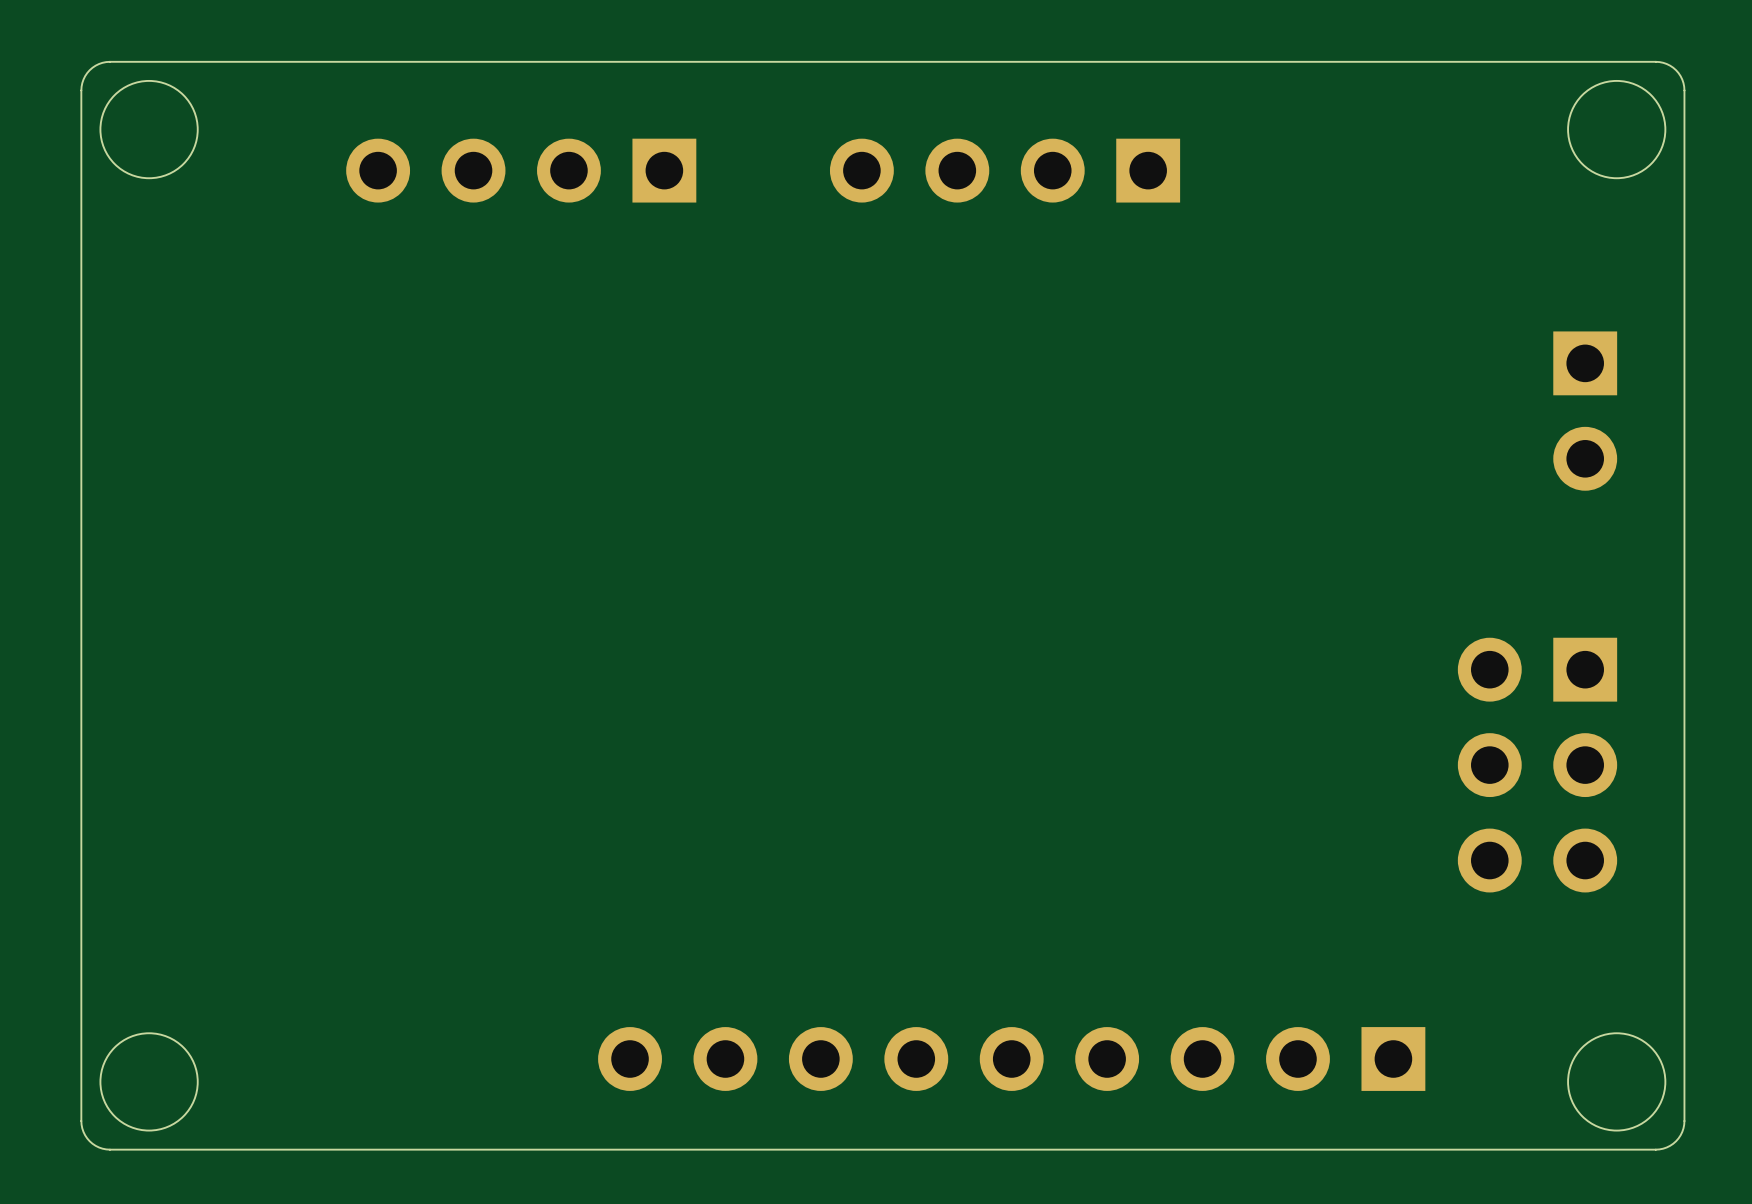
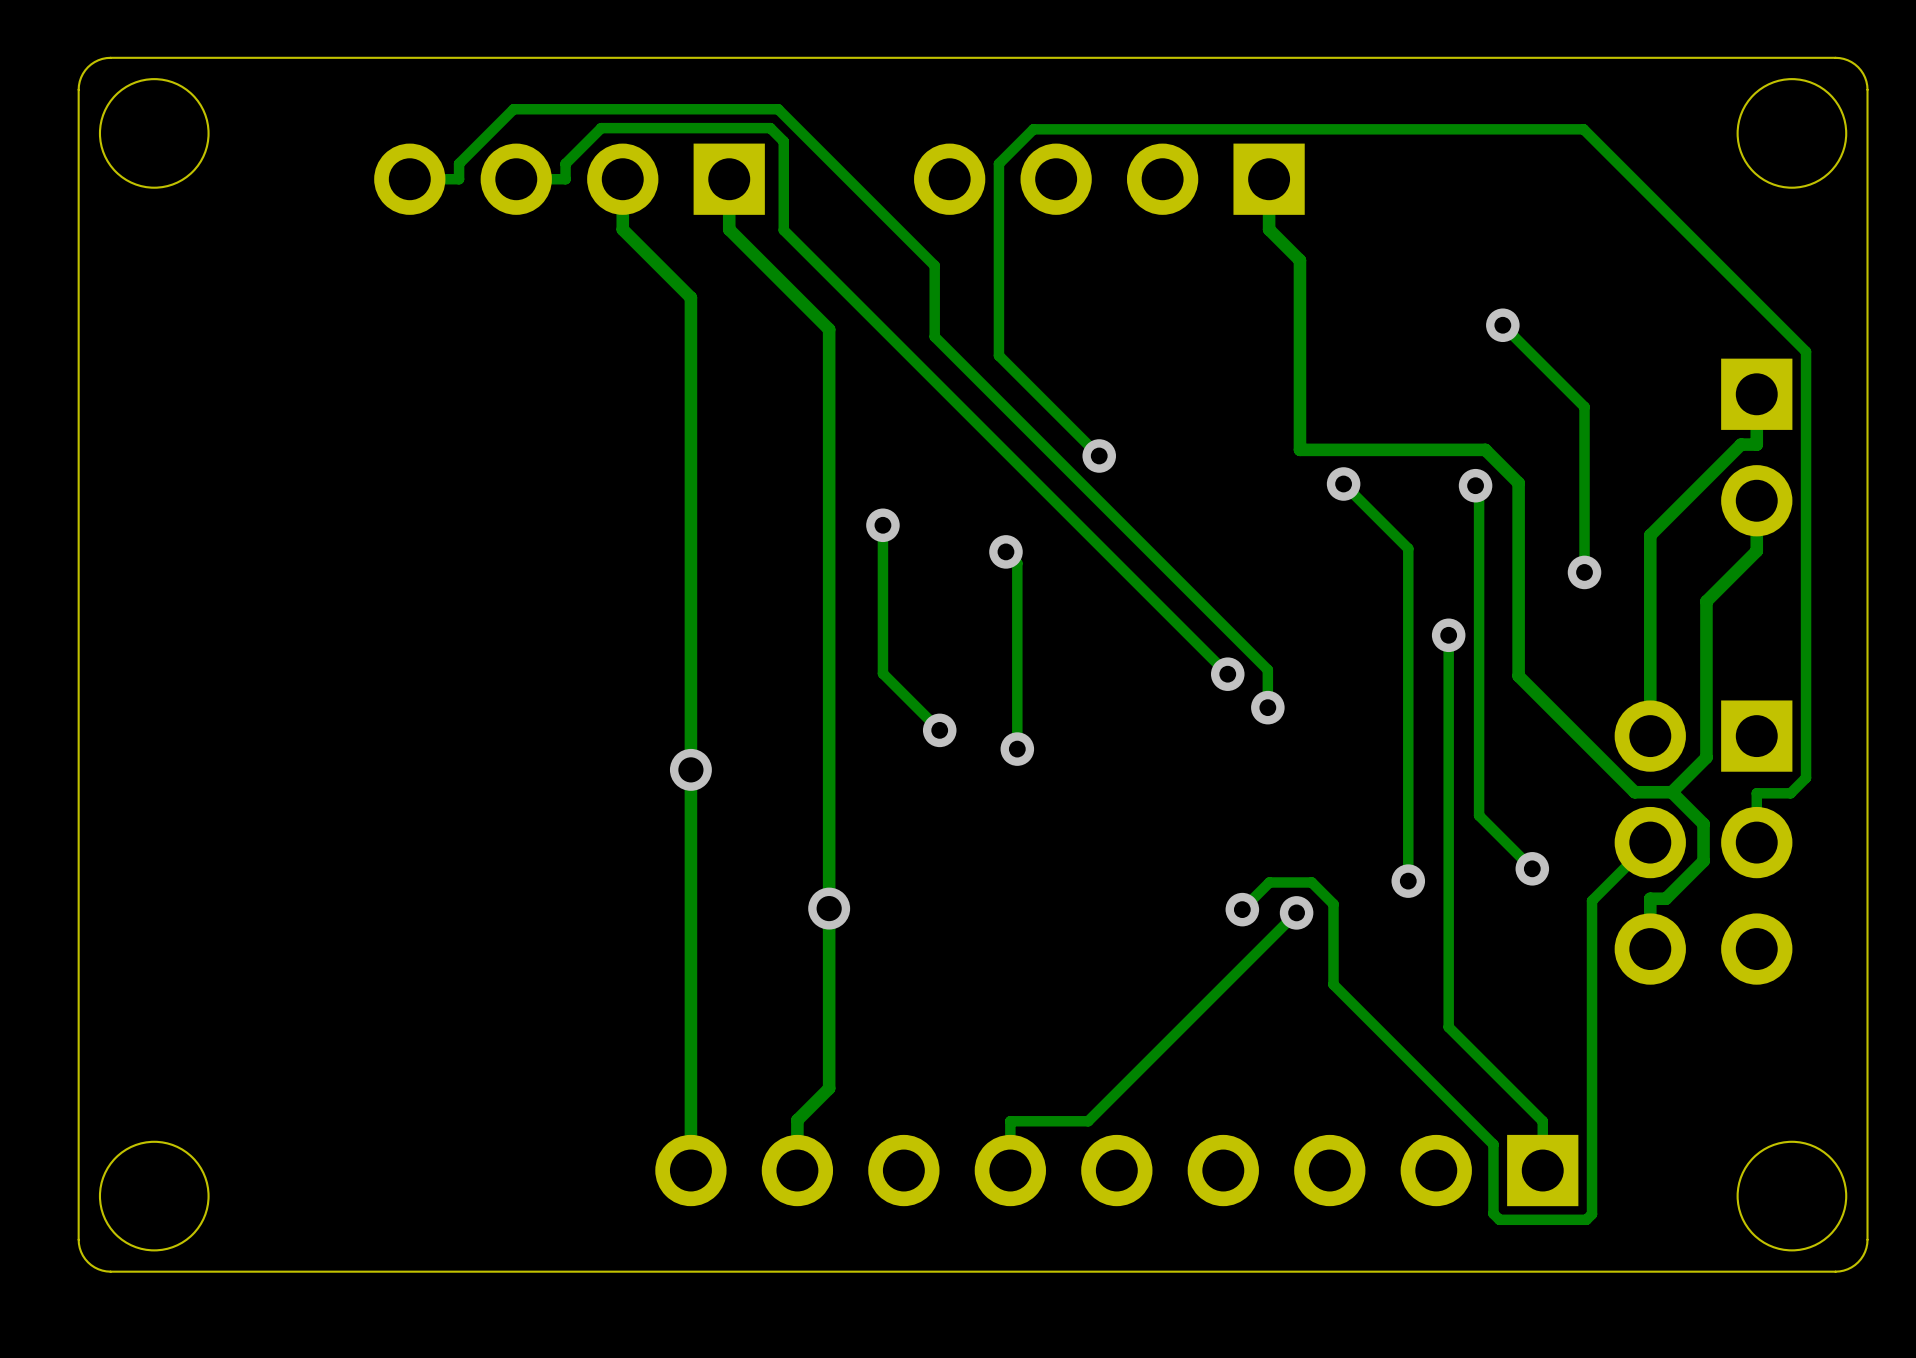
track: none -> (409, 179) (459, 179) (459, 163) (513, 109) (778, 109) (934, 265) (934, 336) (1267, 669) (1267, 707)
track: none -> (516, 179) (565, 179) (565, 163) (601, 128) (770, 128) (783, 141) (783, 230) (1227, 674)
track: none -> (622, 179) (622, 229) (690, 297) (690, 1170)
track: none -> (729, 179) (729, 229) (829, 329) (829, 1088) (797, 1120) (797, 1170)
track: none -> (1269, 179) (1269, 229) (1299, 260) (1299, 449) (1485, 449) (1518, 483) (1518, 676) (1634, 792) (1671, 792)
track: none -> (1502, 325) (1584, 406) (1584, 572)
via: none -> (1502, 325)
track: none -> (1756, 394) (1756, 444) (1741, 444) (1650, 535) (1650, 736)
track: none -> (1099, 455) (998, 355) (998, 163) (1033, 129) (1583, 129) (1806, 351) (1806, 777) (1790, 793) (1756, 793) (1756, 842)
via: none -> (1099, 455)
track: none -> (1343, 483) (1408, 548) (1408, 881)
via: none -> (1343, 483)
track: none -> (1475, 485) (1479, 489) (1479, 815) (1532, 868)
via: none -> (1475, 485)
track: none -> (1756, 500) (1756, 551) (1706, 601) (1706, 757) (1671, 792)
track: none -> (882, 525) (882, 673) (939, 730)
via: none -> (882, 525)
track: none -> (1005, 551) (1017, 563) (1017, 749)
via: none -> (1005, 551)
via: none -> (1584, 572)
track: none -> (1448, 635) (1448, 1027) (1542, 1121) (1542, 1170)
via: none -> (1448, 635)
via: none -> (1227, 674)
via: none -> (1267, 707)
via: none -> (939, 730)
via: none -> (1017, 749)
via: none -> (690, 769)
track: none -> (1671, 792) (1703, 823) (1703, 861) (1665, 898) (1650, 898) (1650, 949)
track: none -> (1650, 842) (1592, 900) (1592, 1214) (1586, 1219) (1499, 1219) (1493, 1213) (1493, 1144) (1333, 984) (1333, 904) (1311, 882) (1269, 882) (1242, 909)
via: none -> (1532, 868)
via: none -> (1408, 881)
via: none -> (829, 908)
via: none -> (1242, 909)
track: none -> (1296, 912) (1088, 1121) (1010, 1121) (1010, 1170)
via: none -> (1296, 912)

